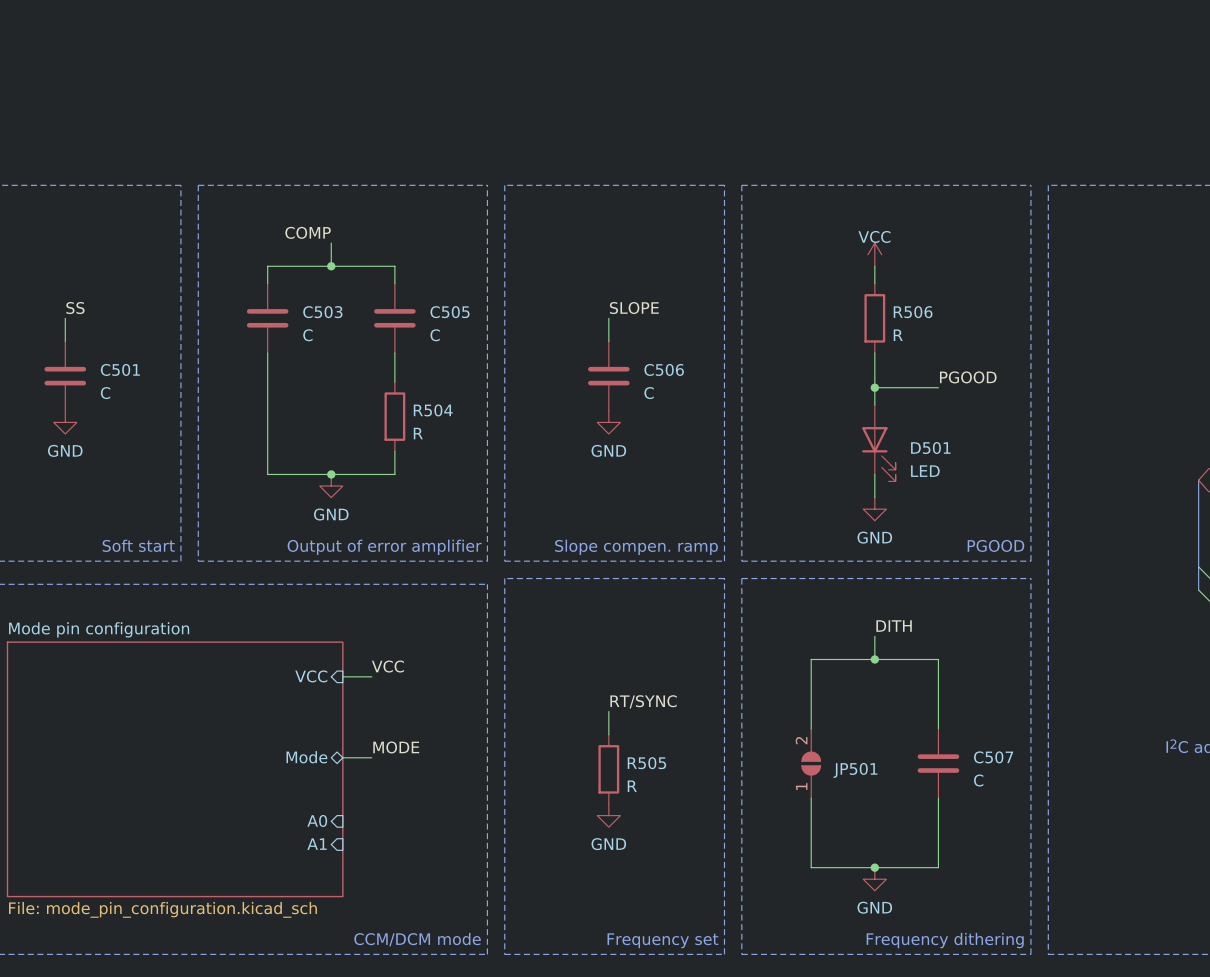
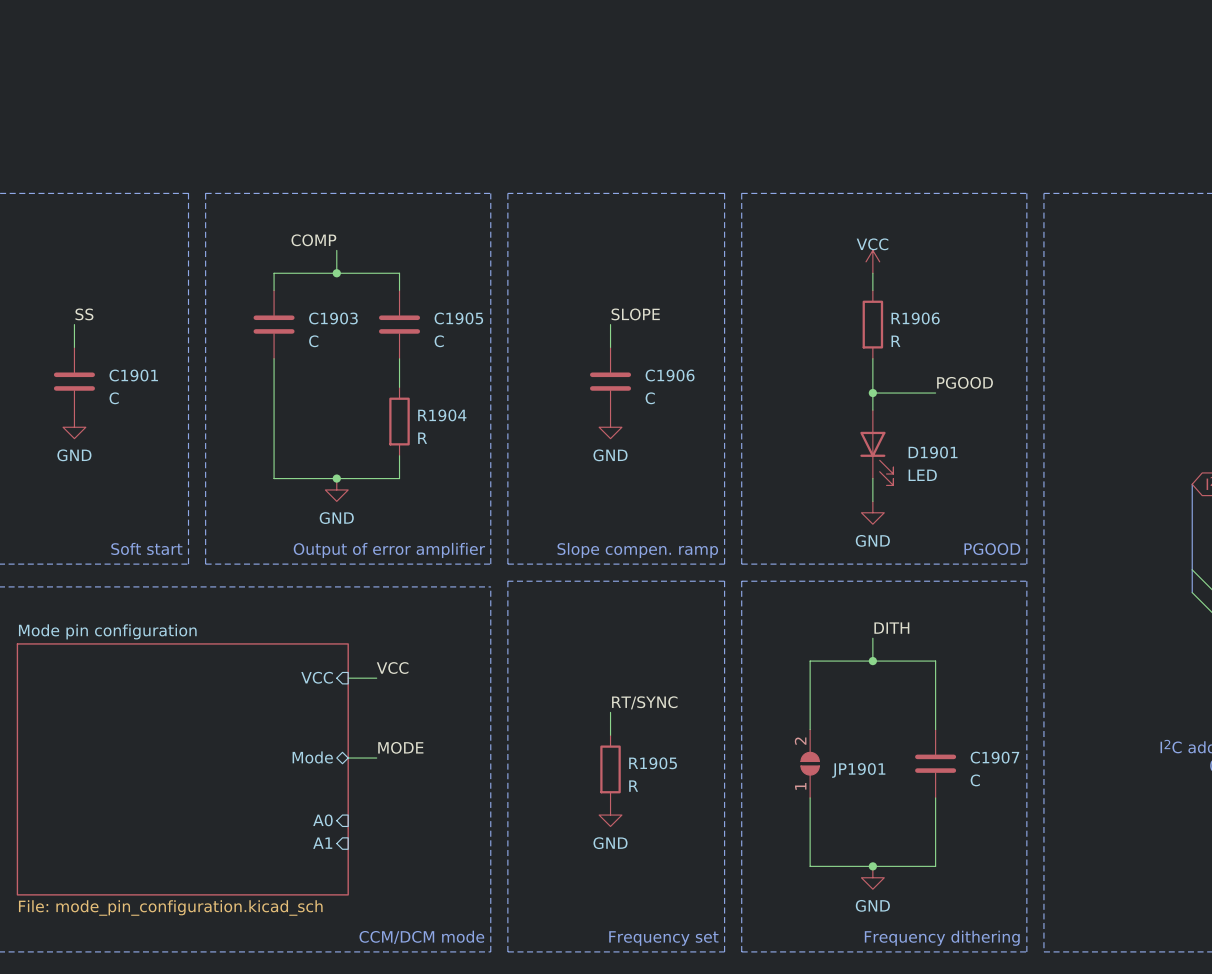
C503 name: C503 (322, 312) -> C1903 (333, 318)
C505 name: C505 (450, 312) -> C1905 (458, 318)
R506 name: R506 (913, 312) -> R1906 (915, 318)
C501 name: C501 (120, 369) -> C1901 (133, 375)
C506 name: C506 (664, 369) -> C1906 (670, 375)
R504 name: R504 (433, 410) -> R1904 (442, 415)
D501 name: D501 (930, 448) -> D1901 (933, 452)
C507 name: C507 (993, 757) -> C1907 (994, 757)
R505 name: R505 (646, 763) -> R1905 (653, 763)
JP501 name: JP501 (855, 770) -> JP1901 (858, 770)

